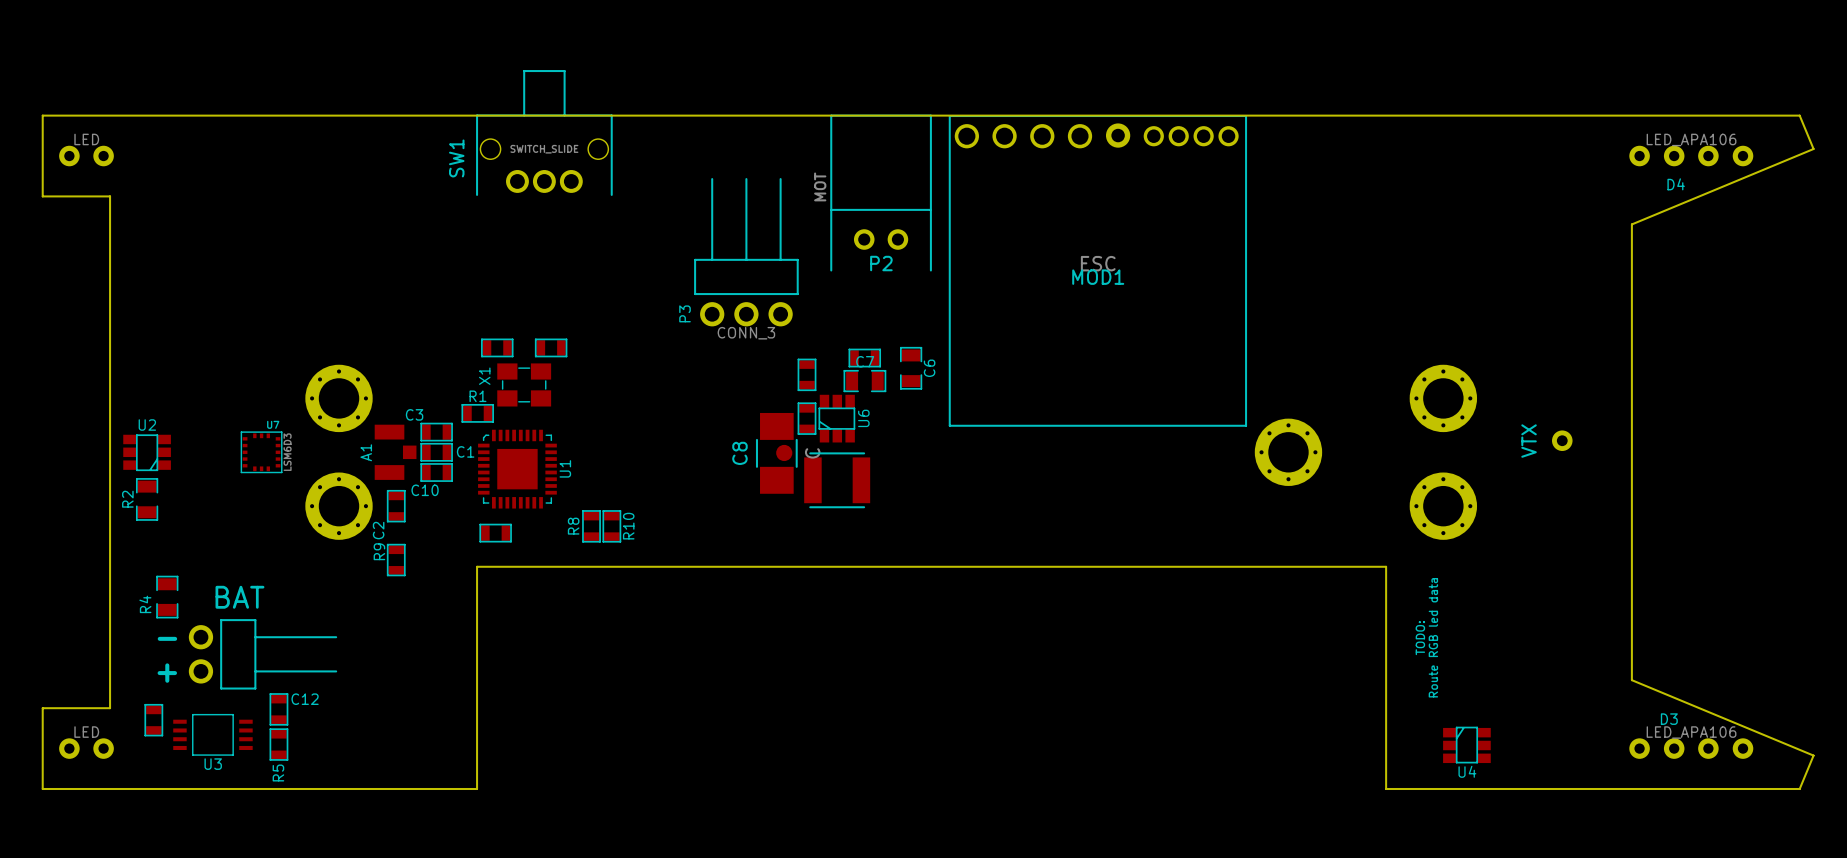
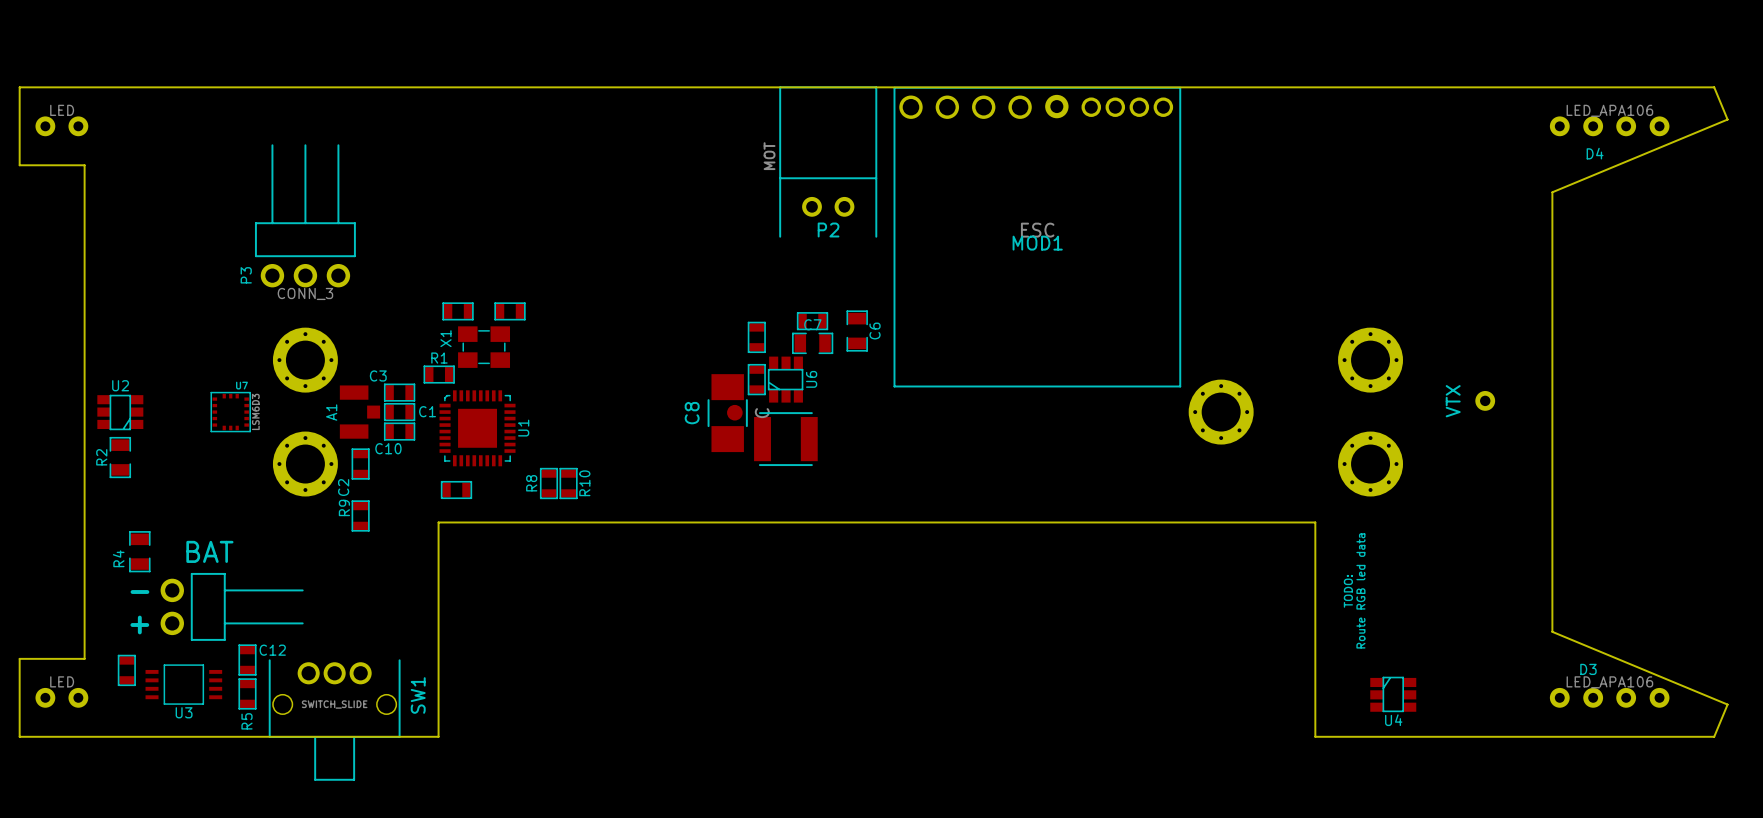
SW1 rotation: 0° (544, 132) -> 180° (334, 720)
SW1 position: (544, 132) -> (334, 720)
P3 position: (746, 252) -> (305, 215)

